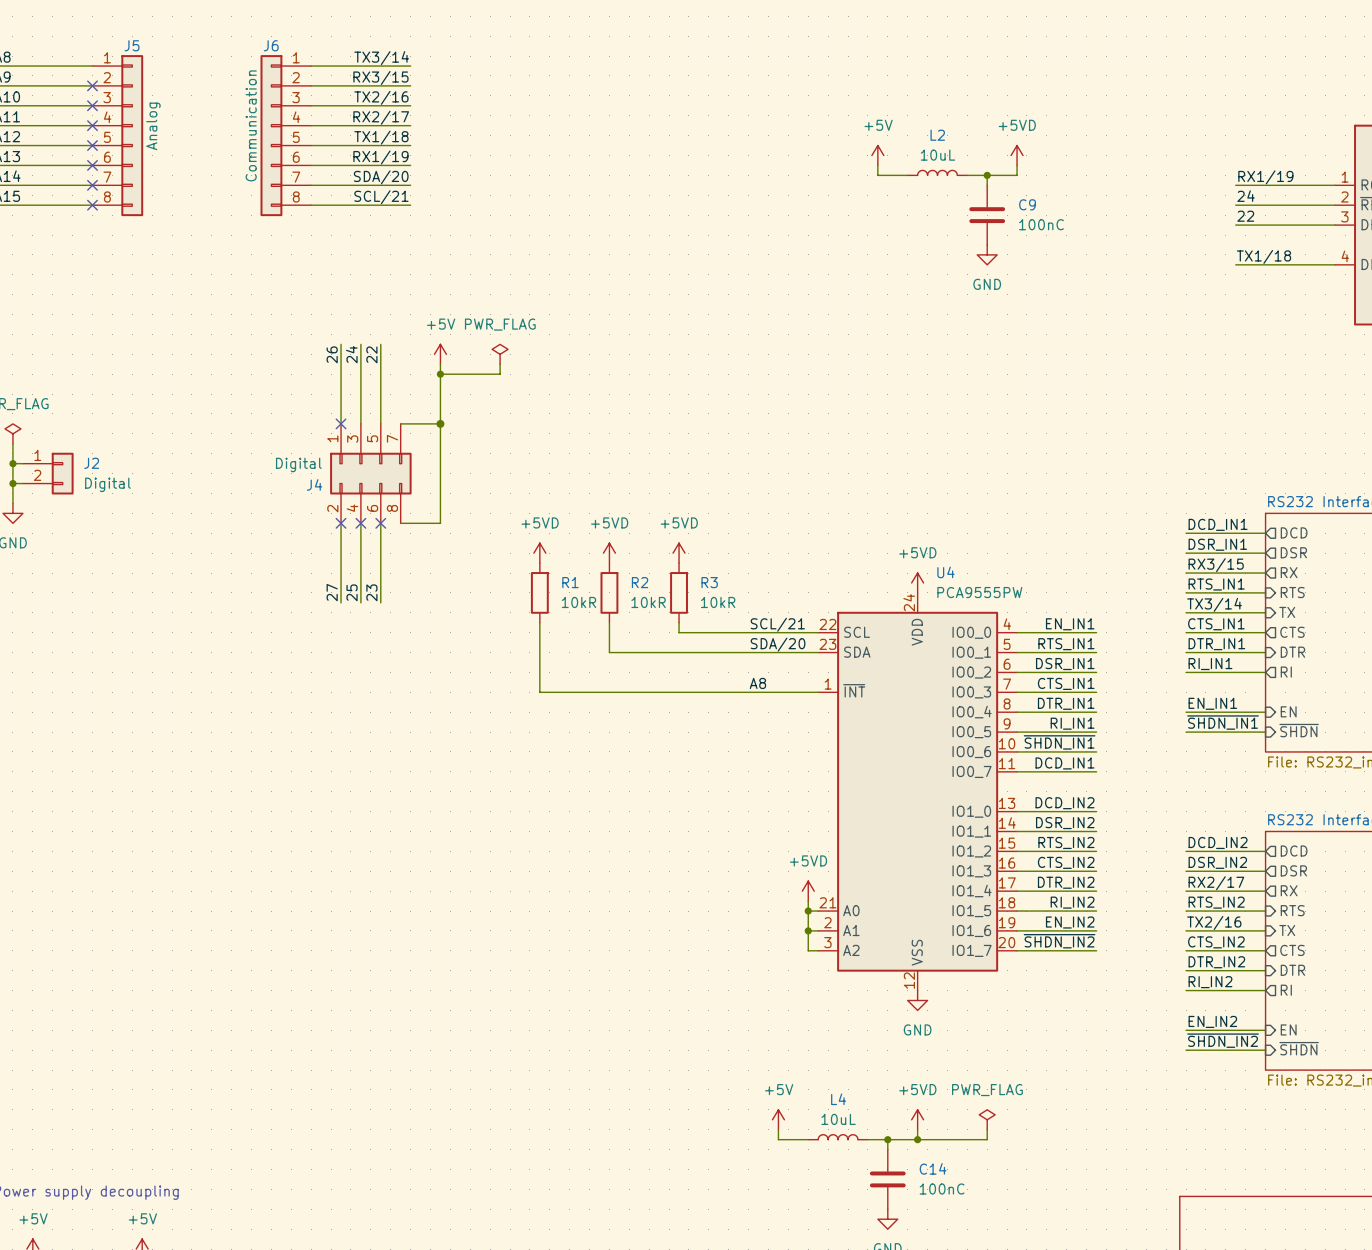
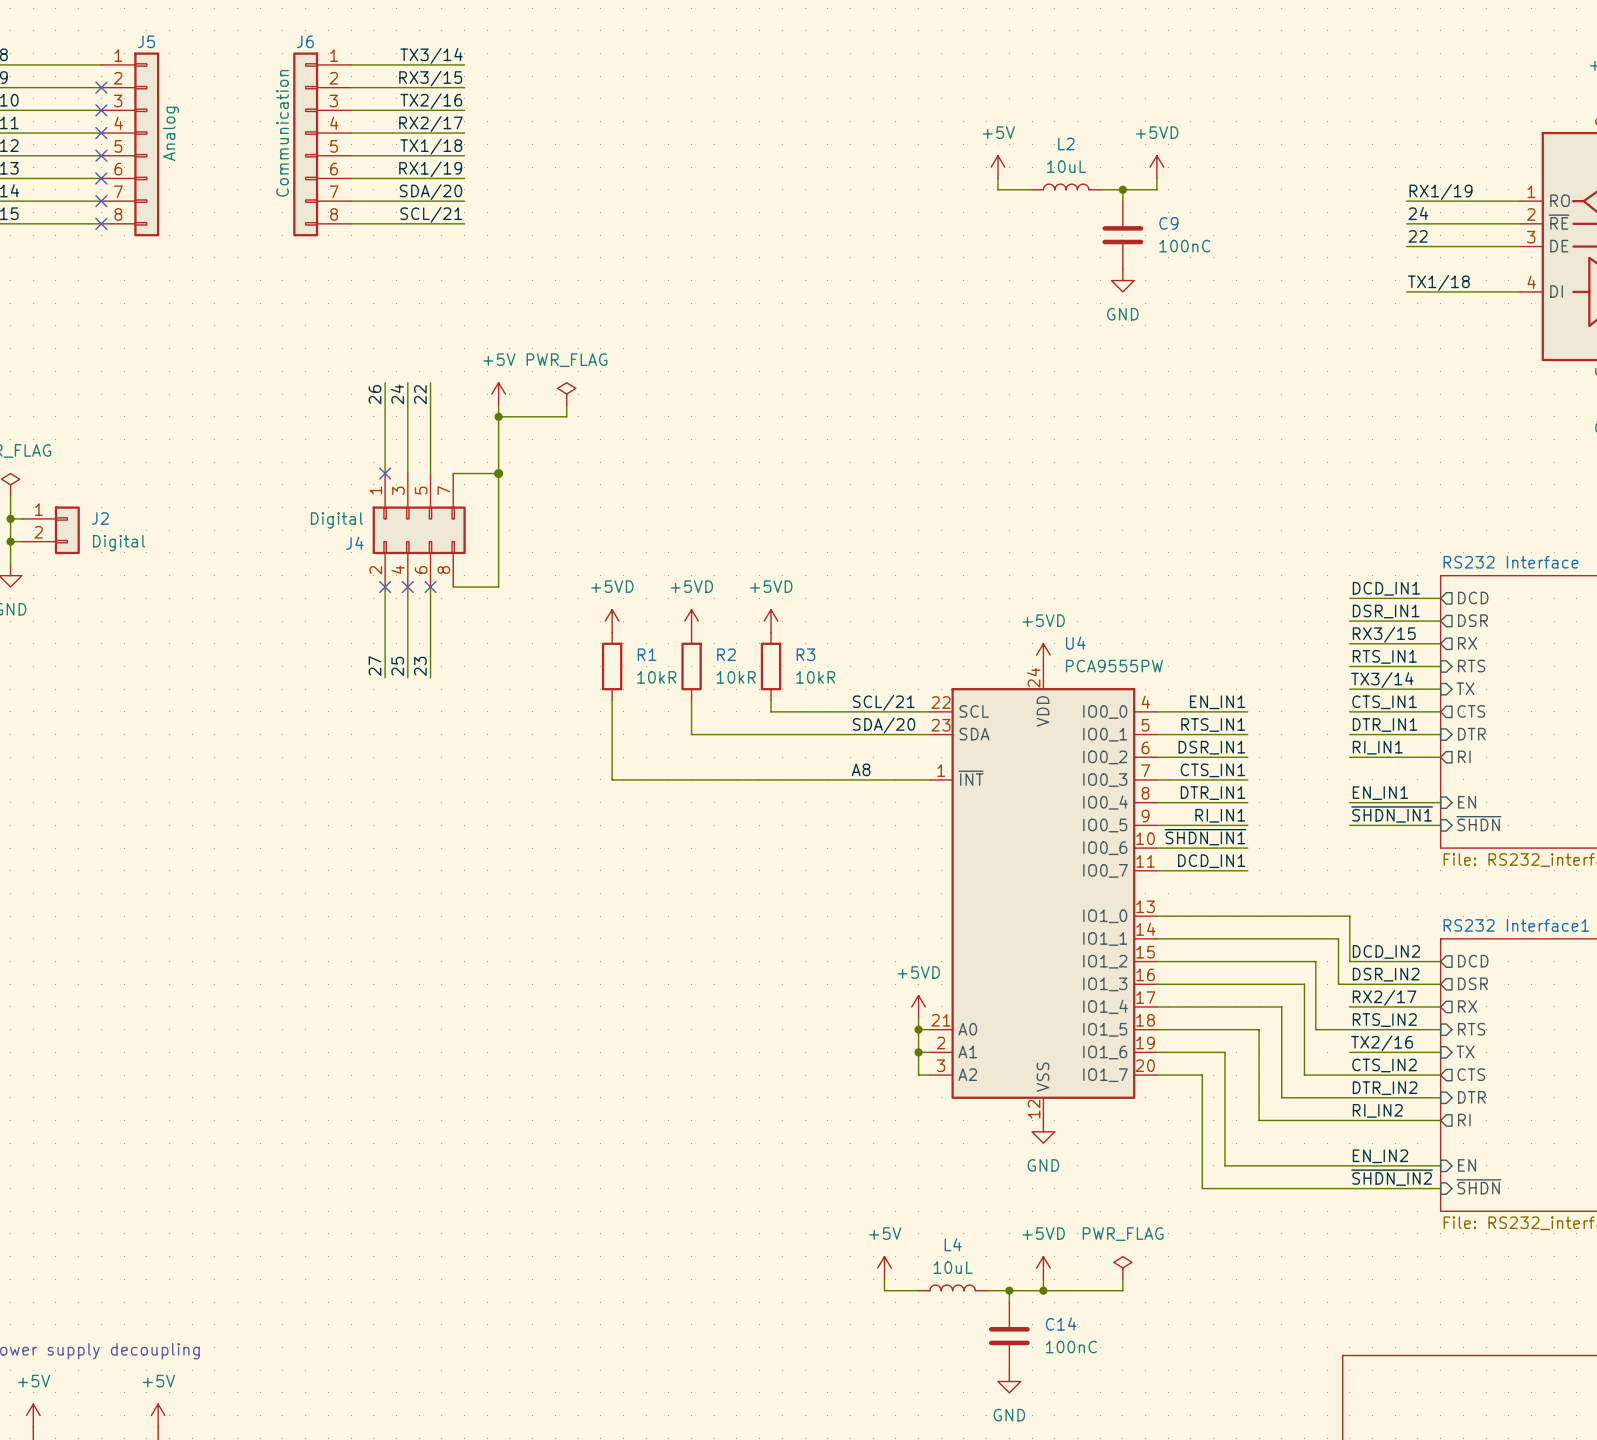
label: DCD_IN2 (1065, 803) -> none
wire: none -> (1247, 916) (1349, 916) (1349, 961)
label: DSR_IN2 (1065, 823) -> none
wire: none -> (1247, 938) (1338, 938) (1338, 984) (1349, 984)
label: RTS_IN2 (1066, 842) -> none
wire: none -> (1247, 961) (1315, 961) (1315, 1029) (1349, 1029)
label: CTS_IN2 (1066, 862) -> none
wire: none -> (1247, 984) (1304, 984) (1304, 1075) (1349, 1075)
label: DTR_IN2 (1066, 882) -> none
wire: none -> (1247, 1006) (1281, 1006) (1281, 1097) (1349, 1097)
label: RI_IN2 (1072, 902) -> none
wire: none -> (1247, 1029) (1259, 1029) (1259, 1120) (1349, 1120)
label: EN_IN2 (1070, 922) -> none
wire: (1076, 930) (1096, 930) -> (1225, 1052) (1225, 1165) (1349, 1165)
label: ~{SHDN_IN2} (1059, 941) -> none
wire: (1056, 950) (1096, 950) -> (1202, 1075) (1202, 1188) (1349, 1188)

